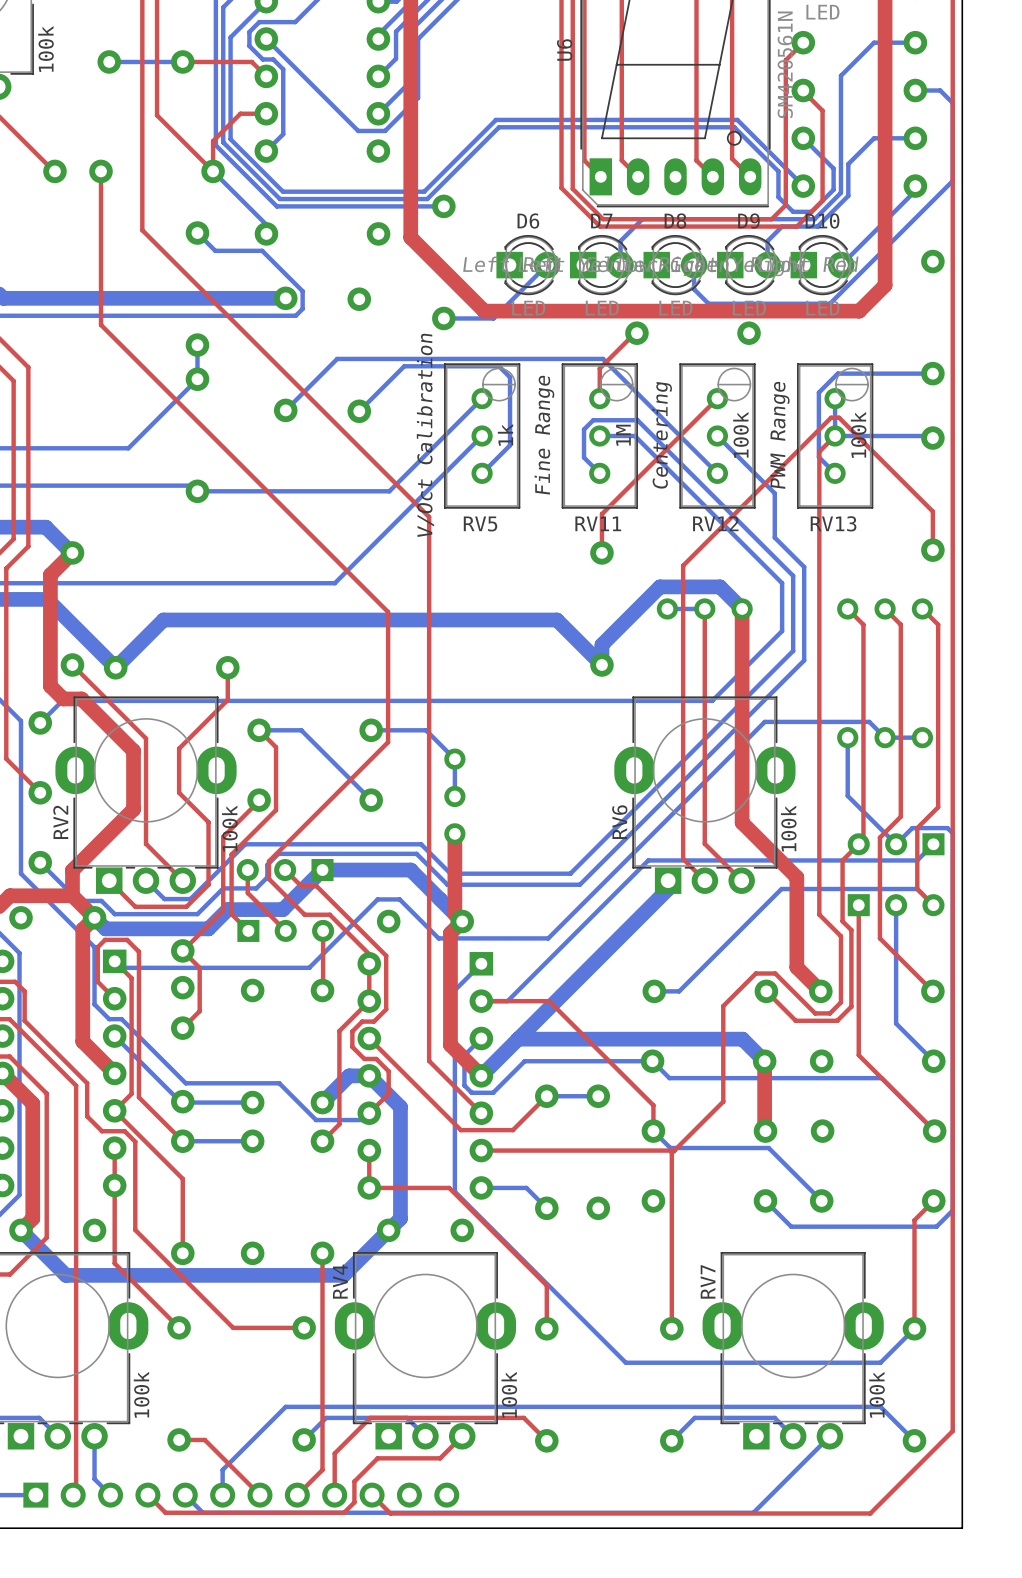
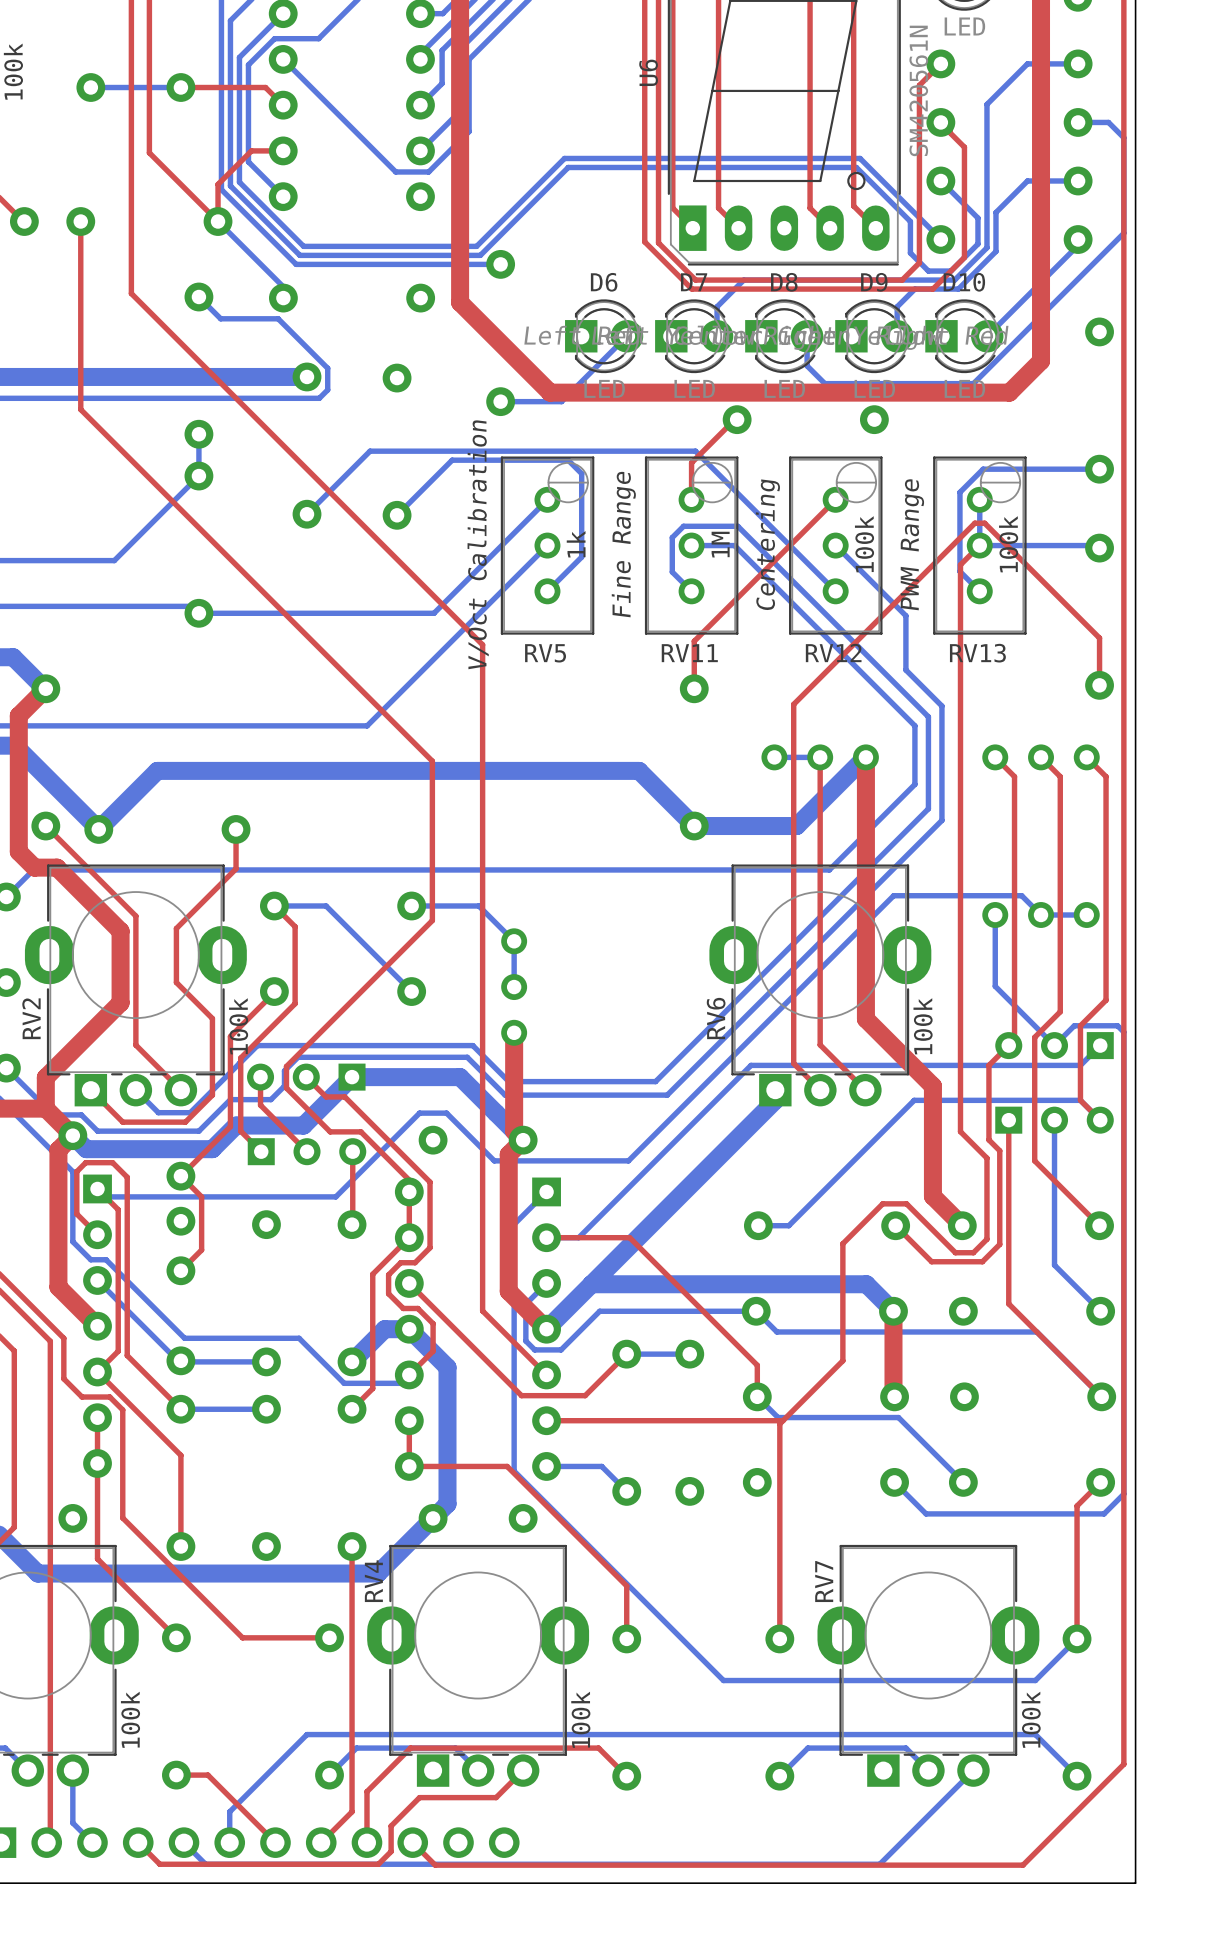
bottom track: (249, 32) (249, 46) (262, 59) (273, 59) (283, 69) (283, 134) (266, 151) -> (262, 50) (248, 64) (248, 161) (283, 196)
bottom track: (742, 608) (720, 586) (659, 586) (601, 644) (601, 665) -> (865, 757) (796, 826) (694, 826)

